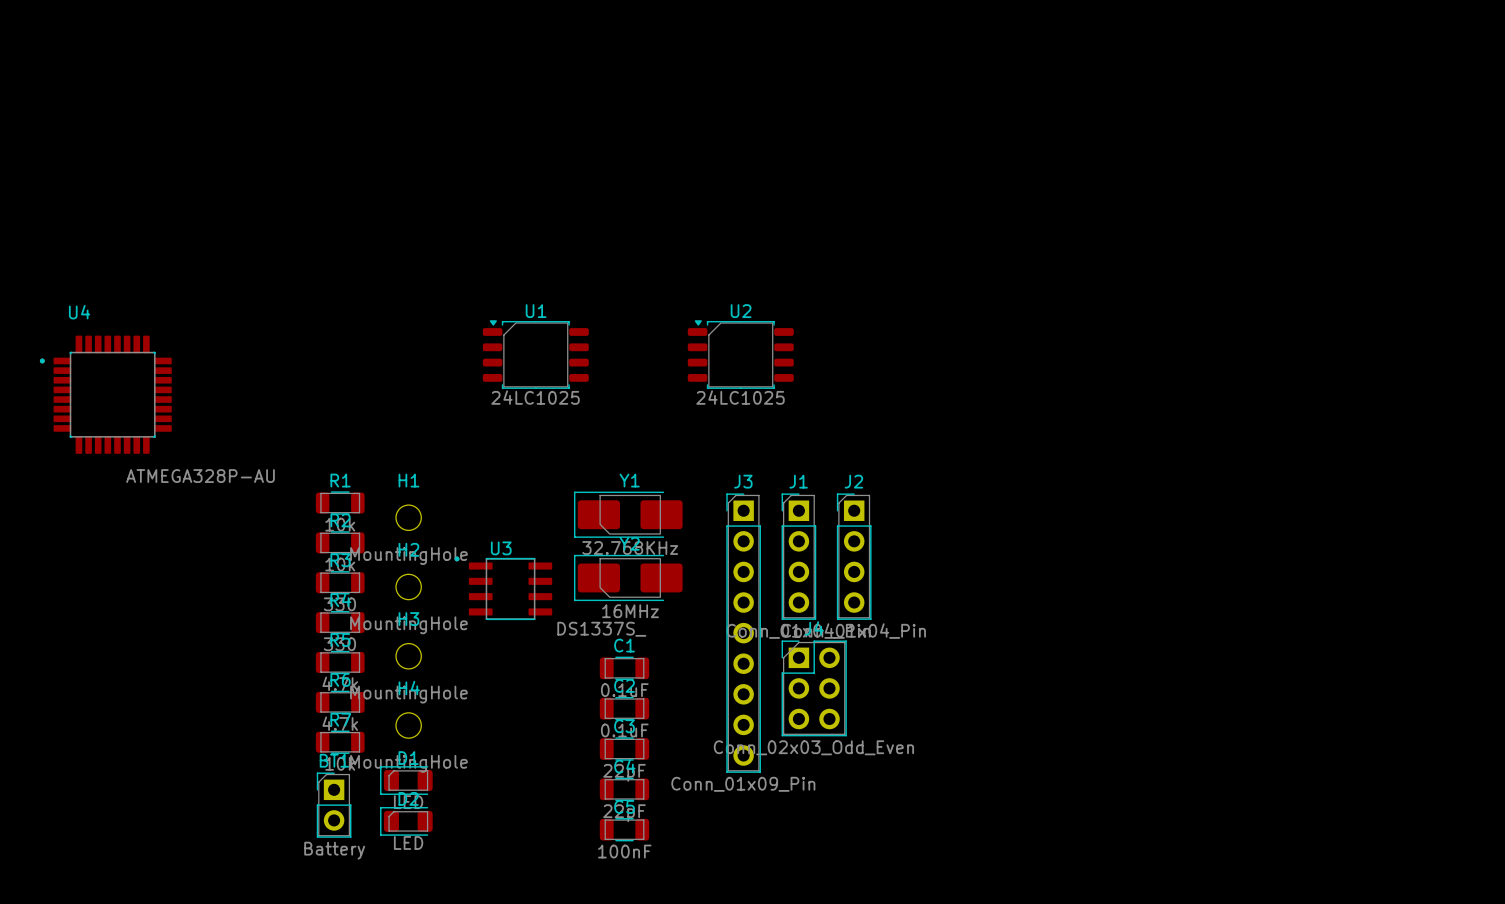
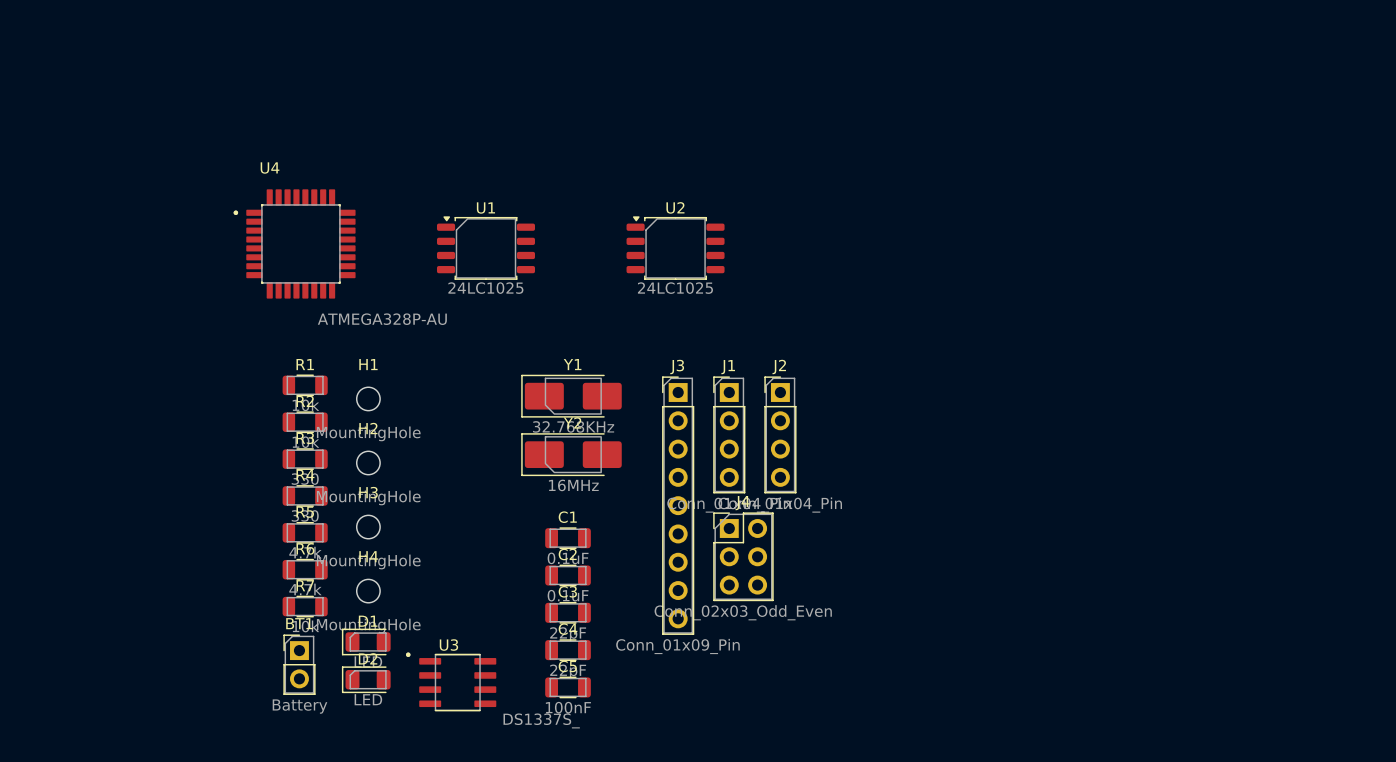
U4 position: (105, 394) -> (294, 243)
U3 position: (503, 588) -> (451, 681)

